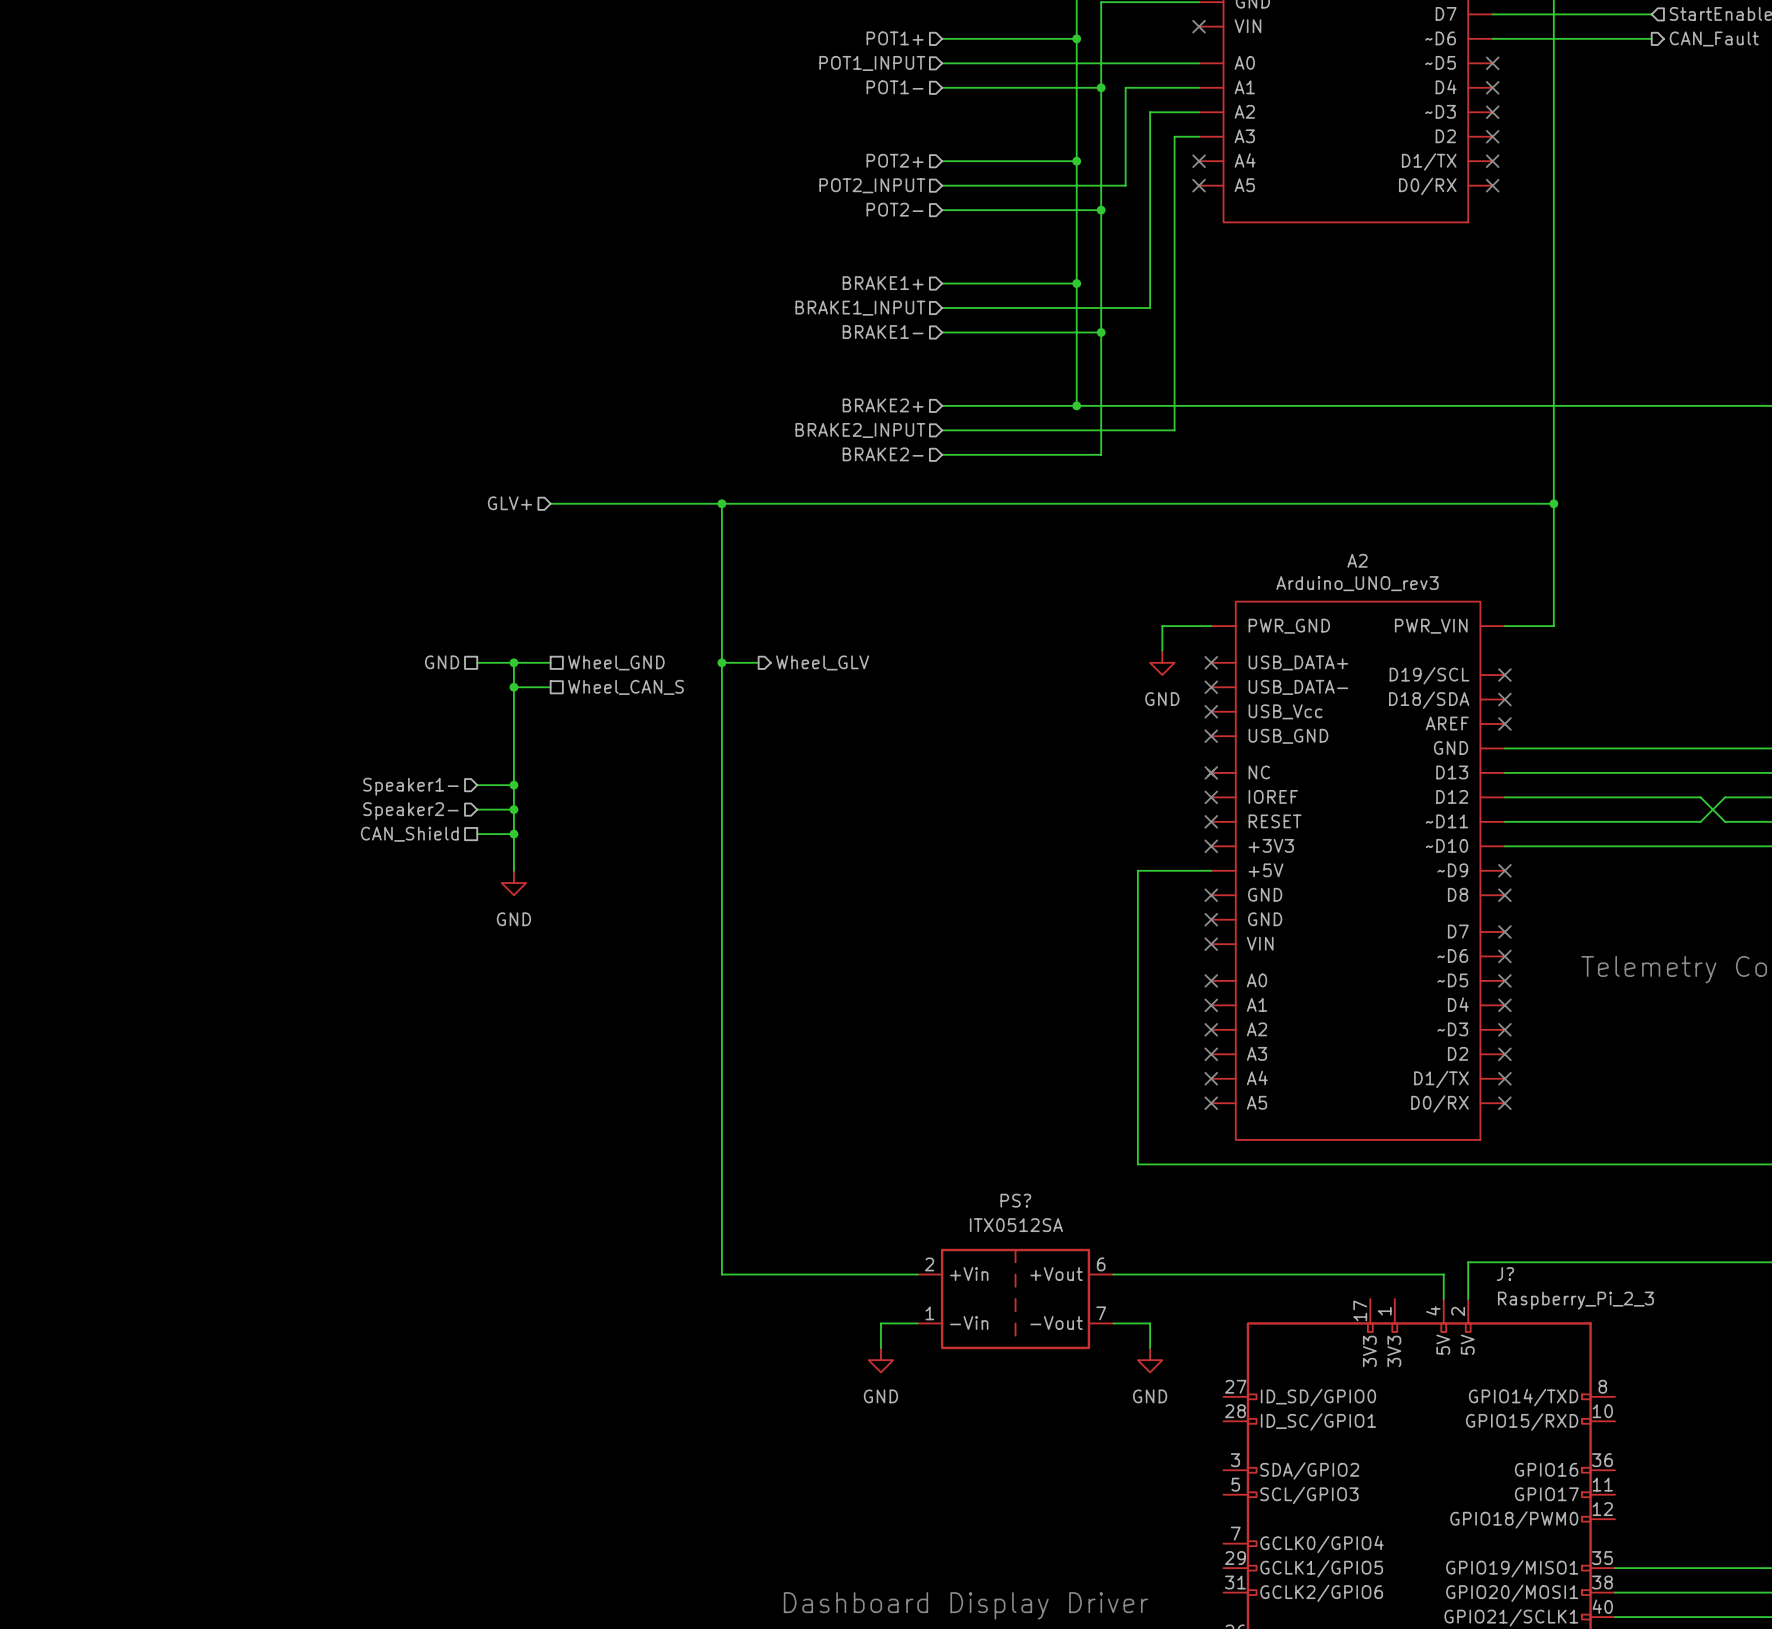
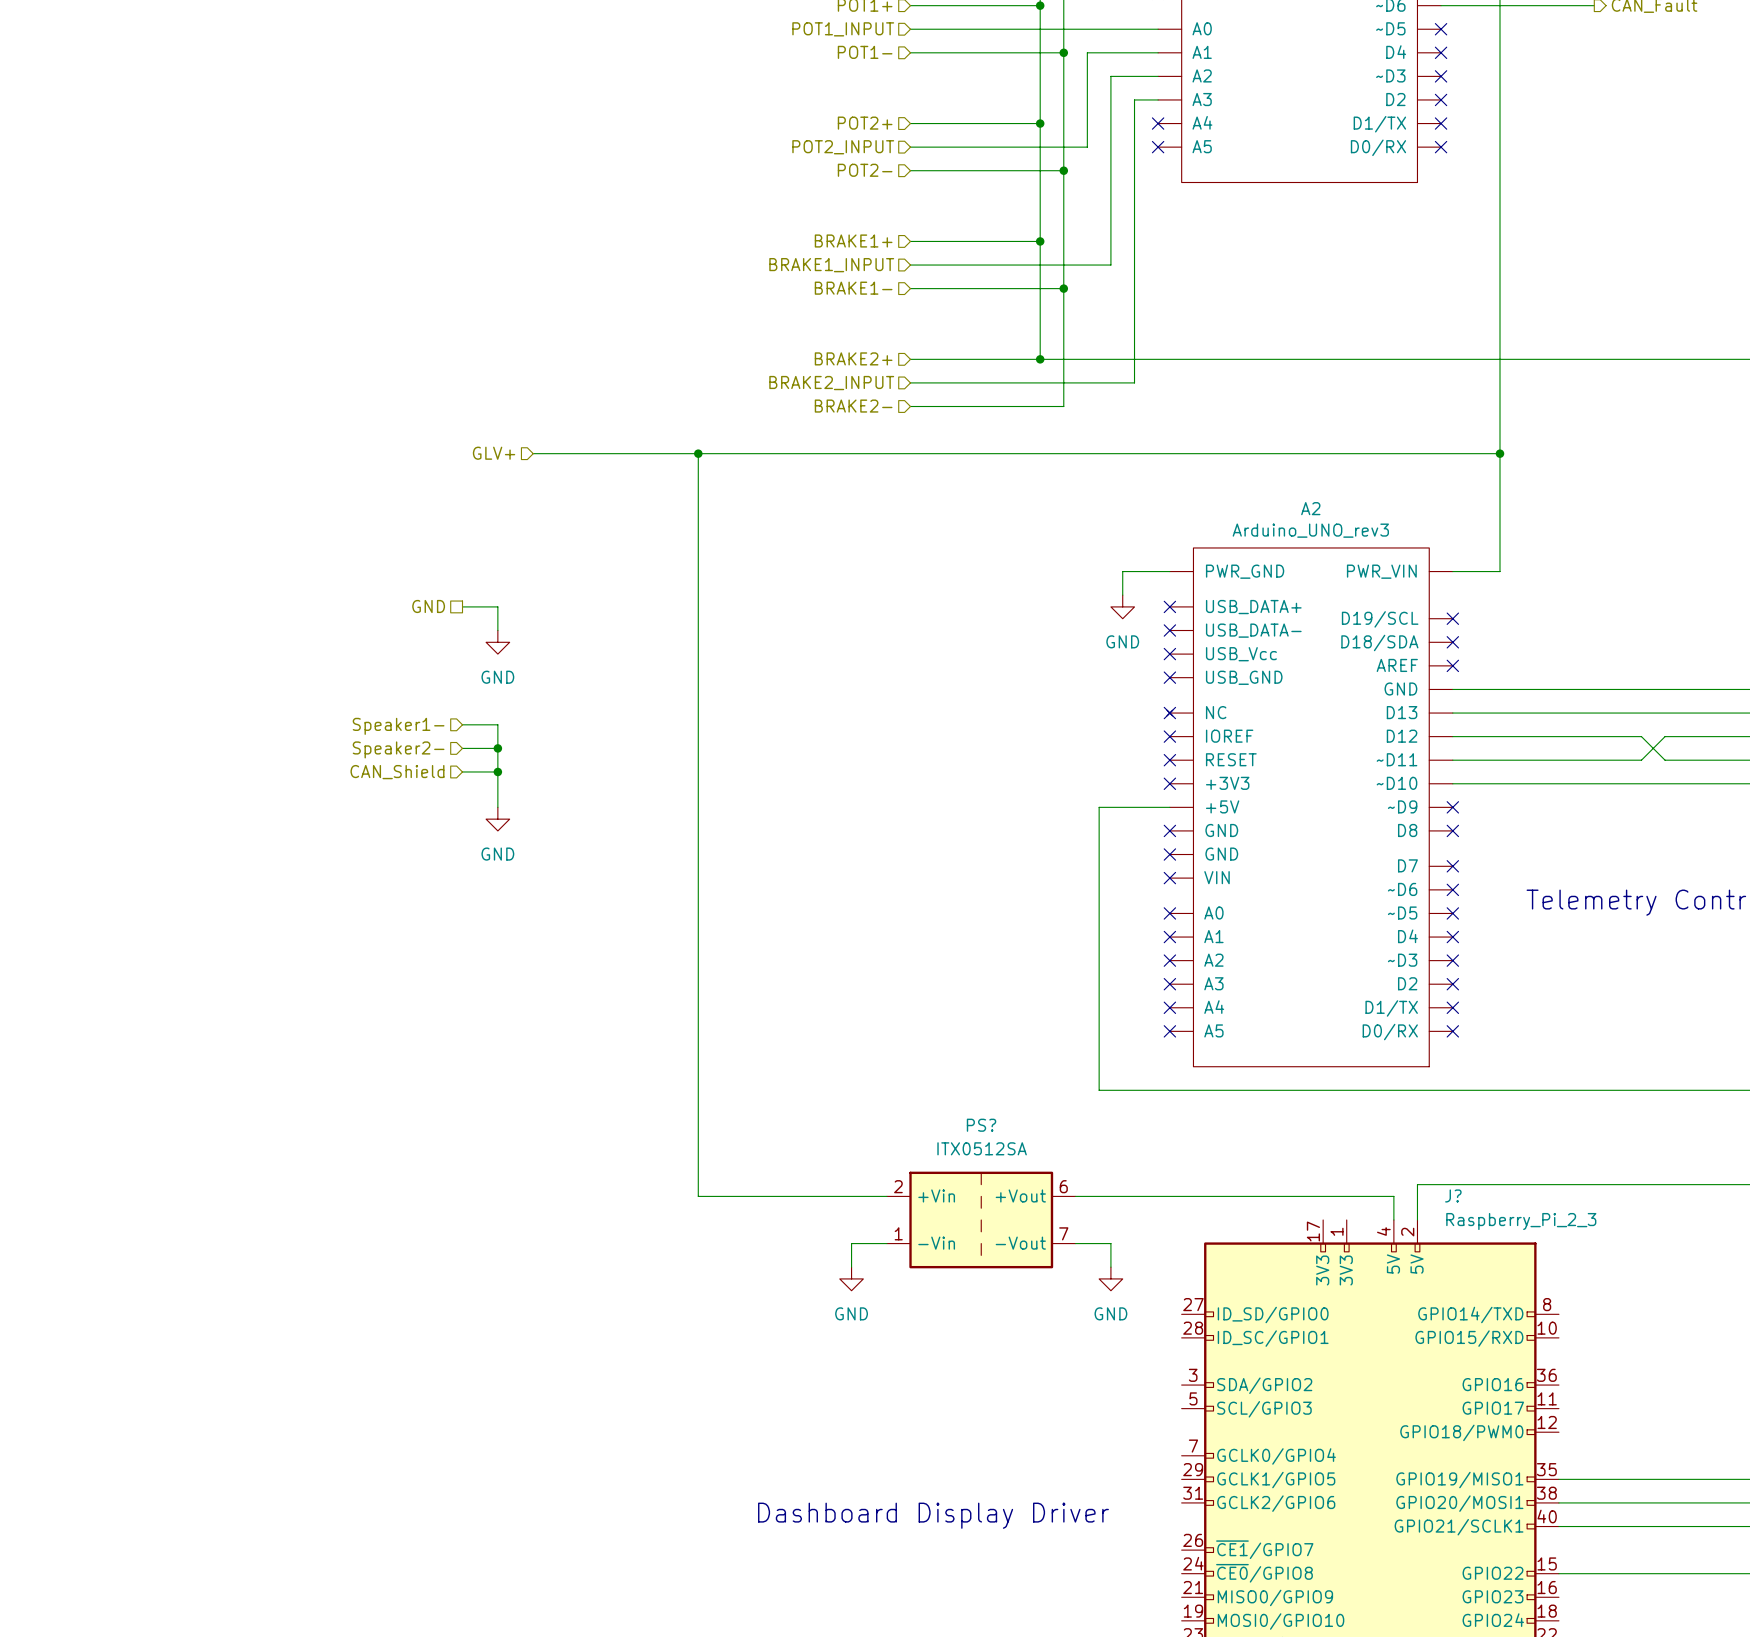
wire: (513, 662) (550, 662) -> none
junction: (513, 662) -> none
hierarchical label: Wheel_GND (616, 662) -> none
wire: (721, 662) (758, 662) -> none
junction: (721, 662) -> none
hierarchical label: Wheel_GLV (822, 662) -> none
junction: (513, 687) -> none
wire: (550, 687) (513, 687) (513, 785) -> none
hierarchical label: Wheel_CAN_S (625, 687) -> none
power symbol: none -> GND (497, 642)
junction: (513, 785) -> none
hierarchical label shape: passive (409, 834) -> input (397, 772)

